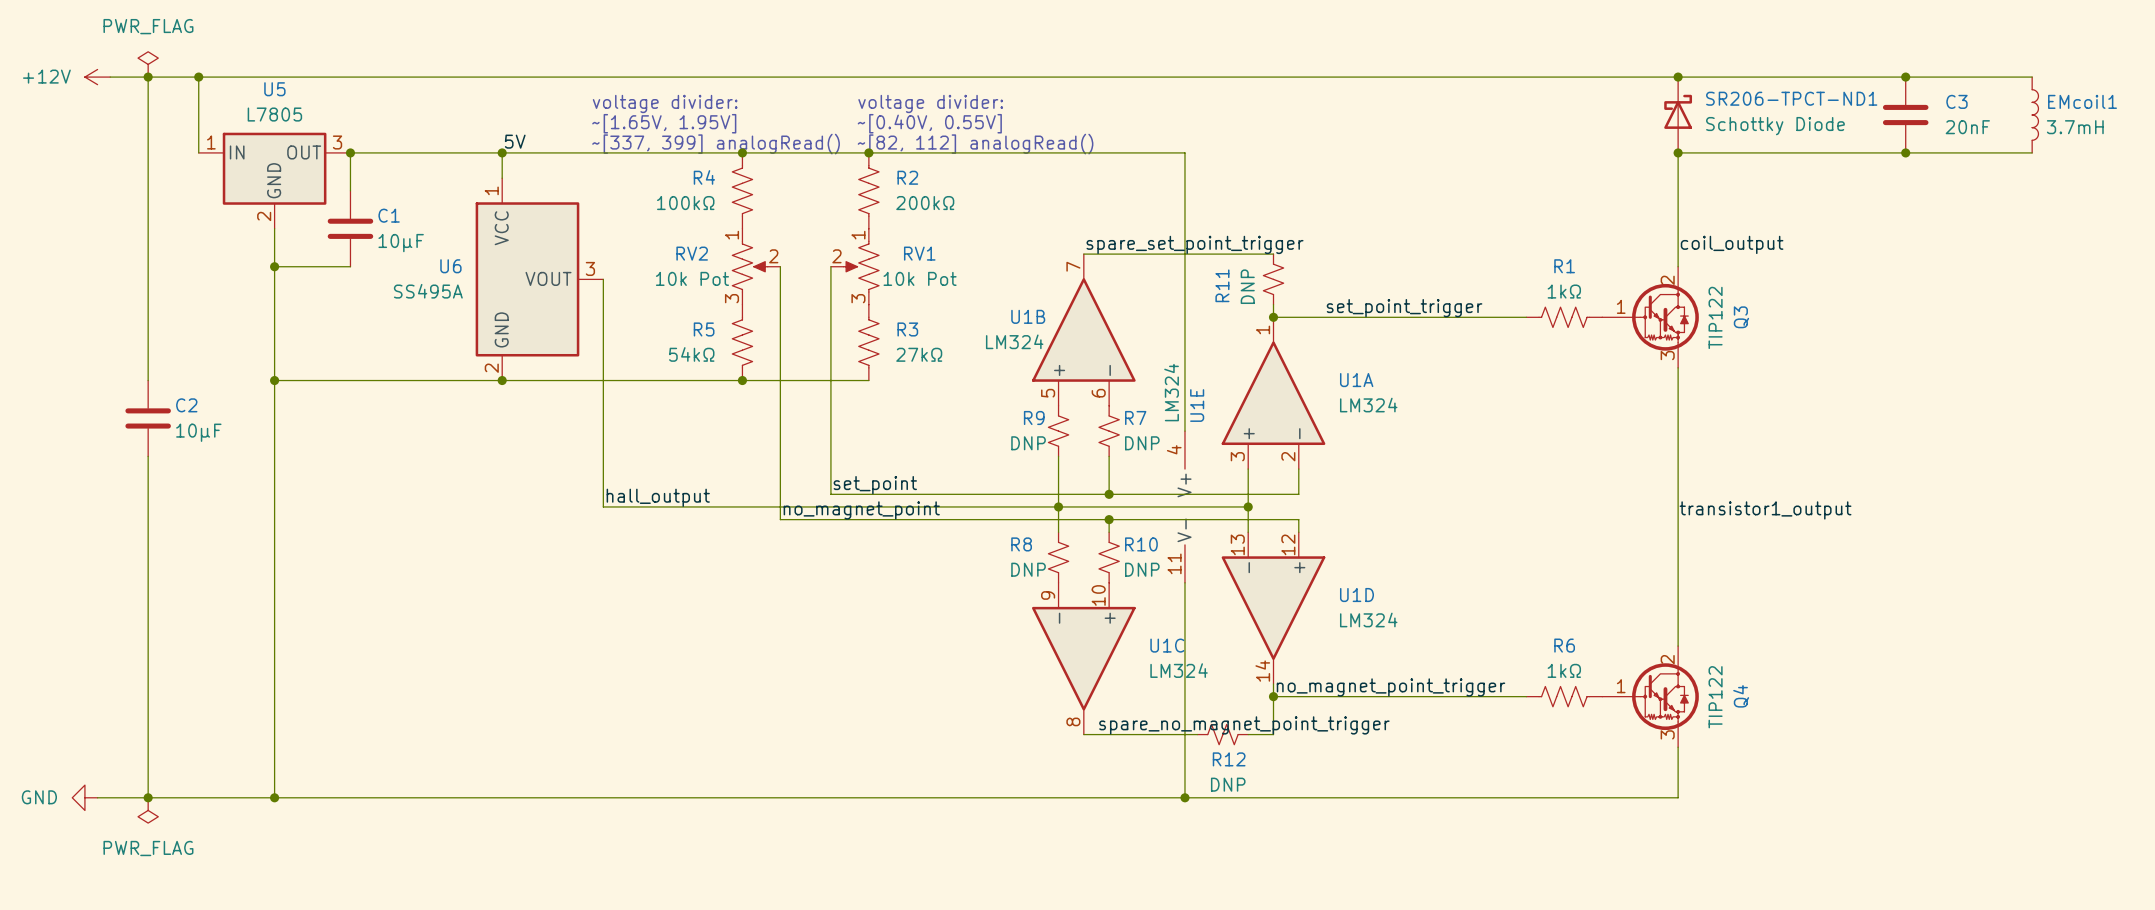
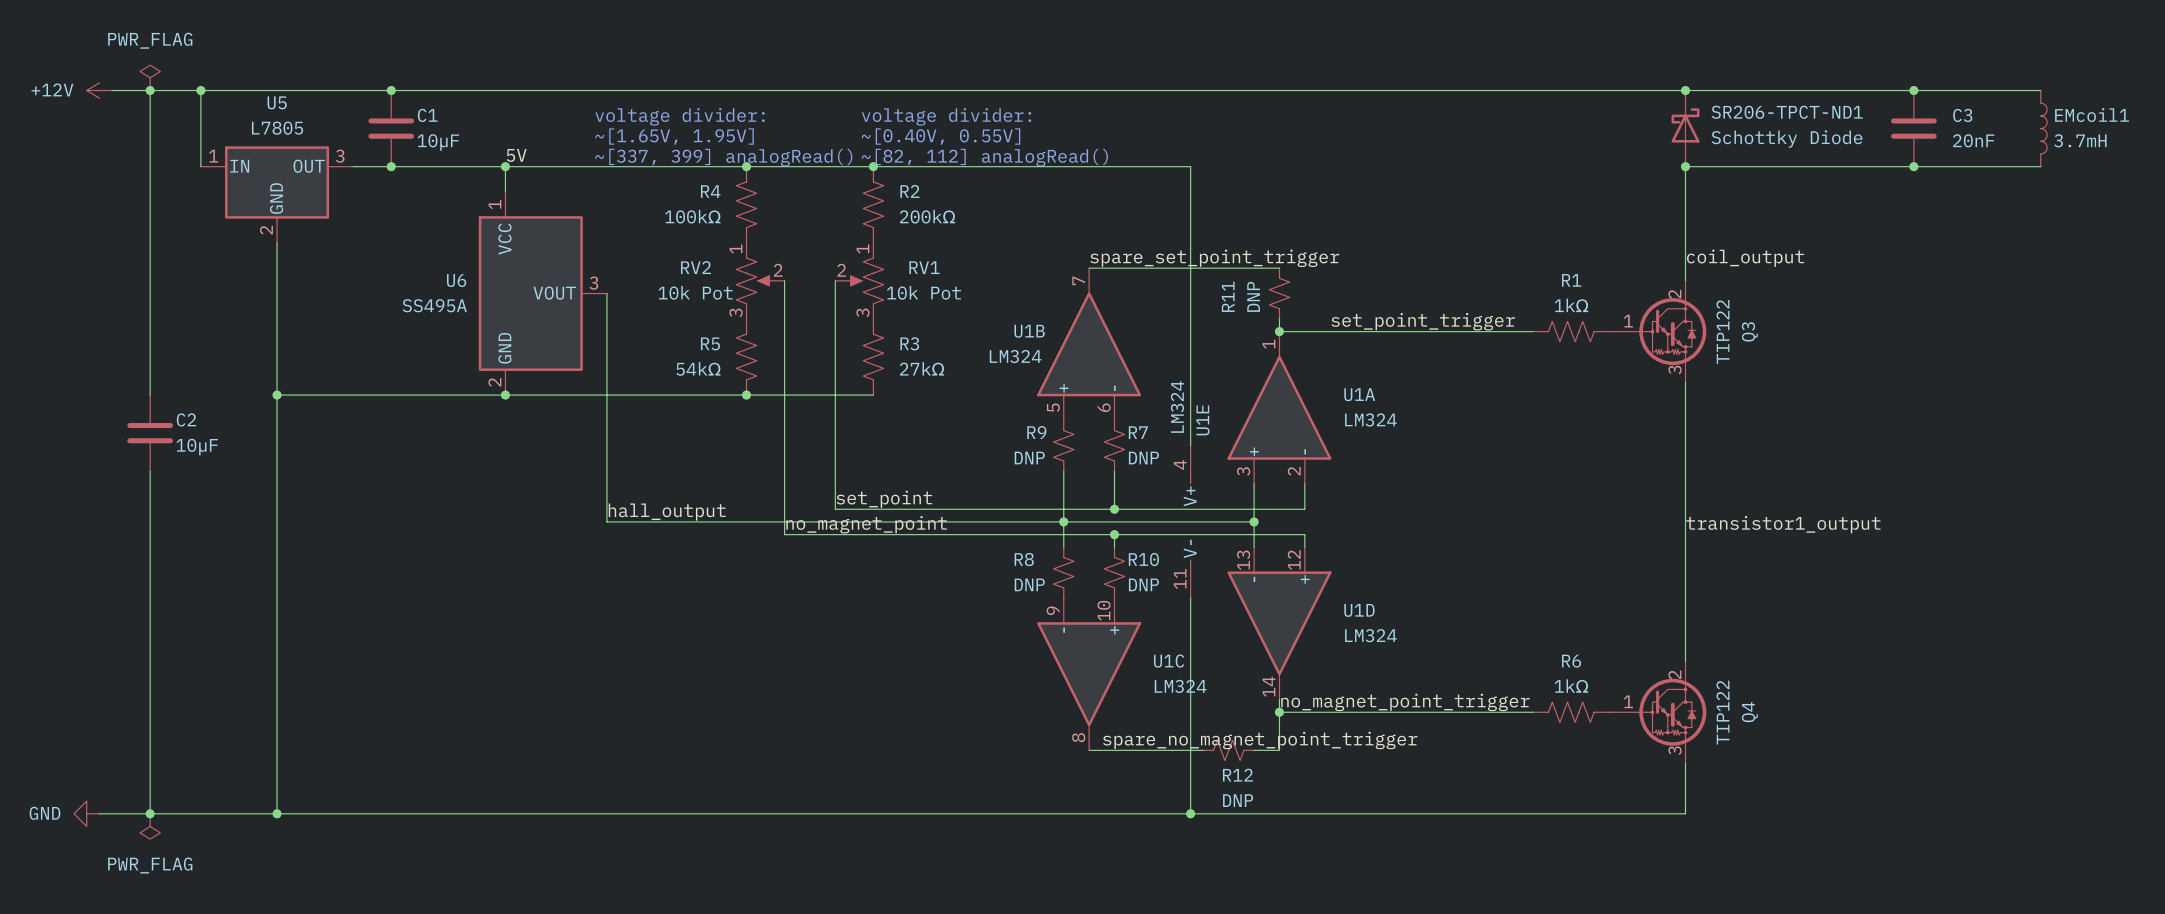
junction: none -> (391, 90)
wire: (350, 152) (350, 190) -> none
junction position: (350, 152) -> (391, 166)
C1 position: (350, 228) -> (391, 128)
wire: (274, 266) (350, 266) -> none
junction: (274, 266) -> none

